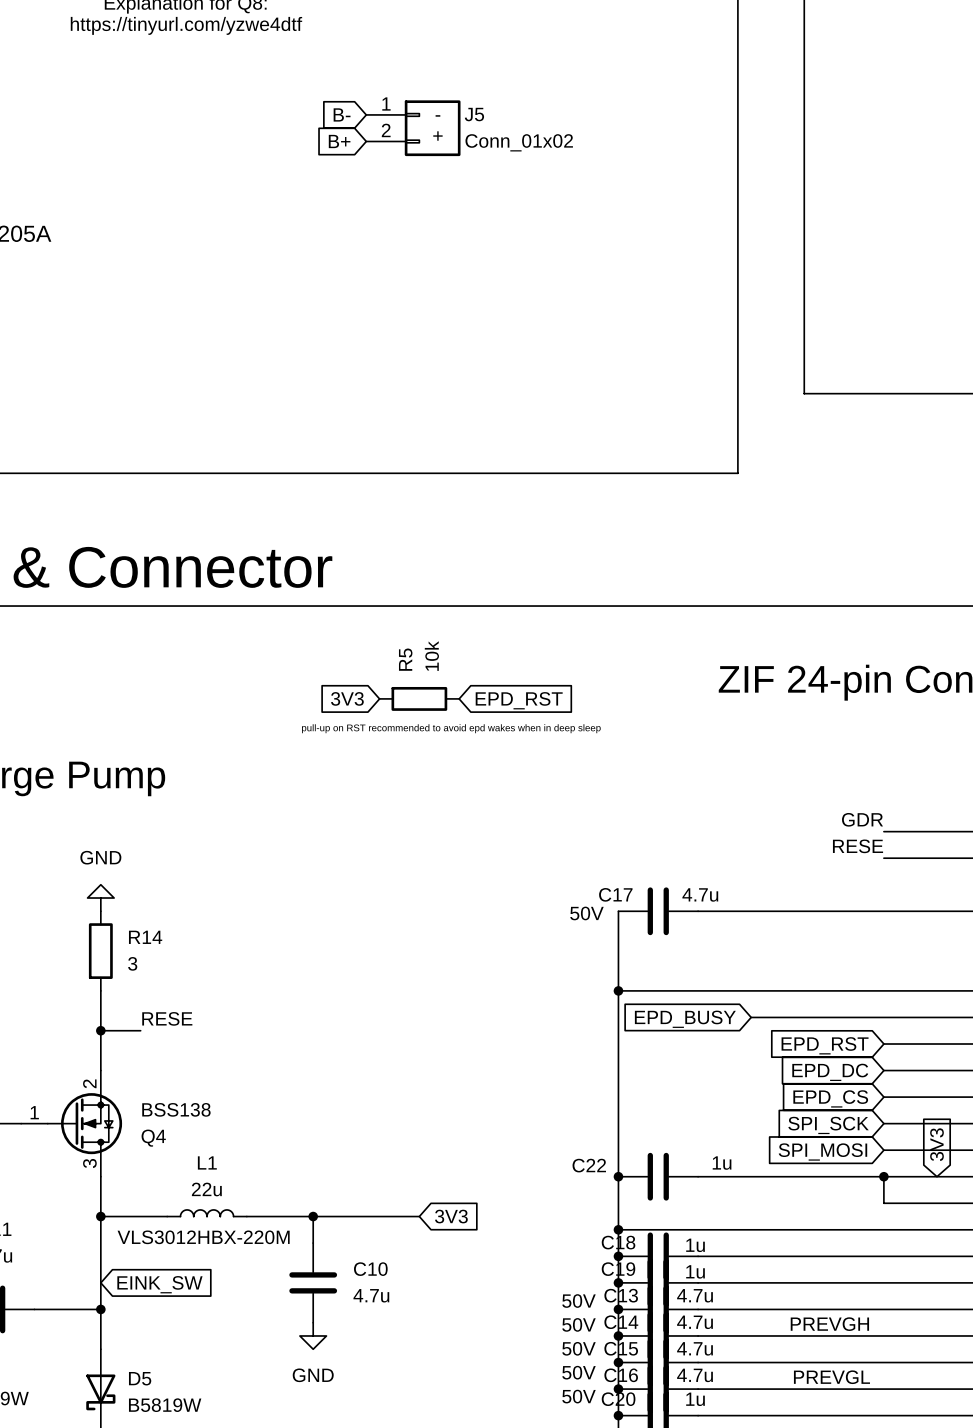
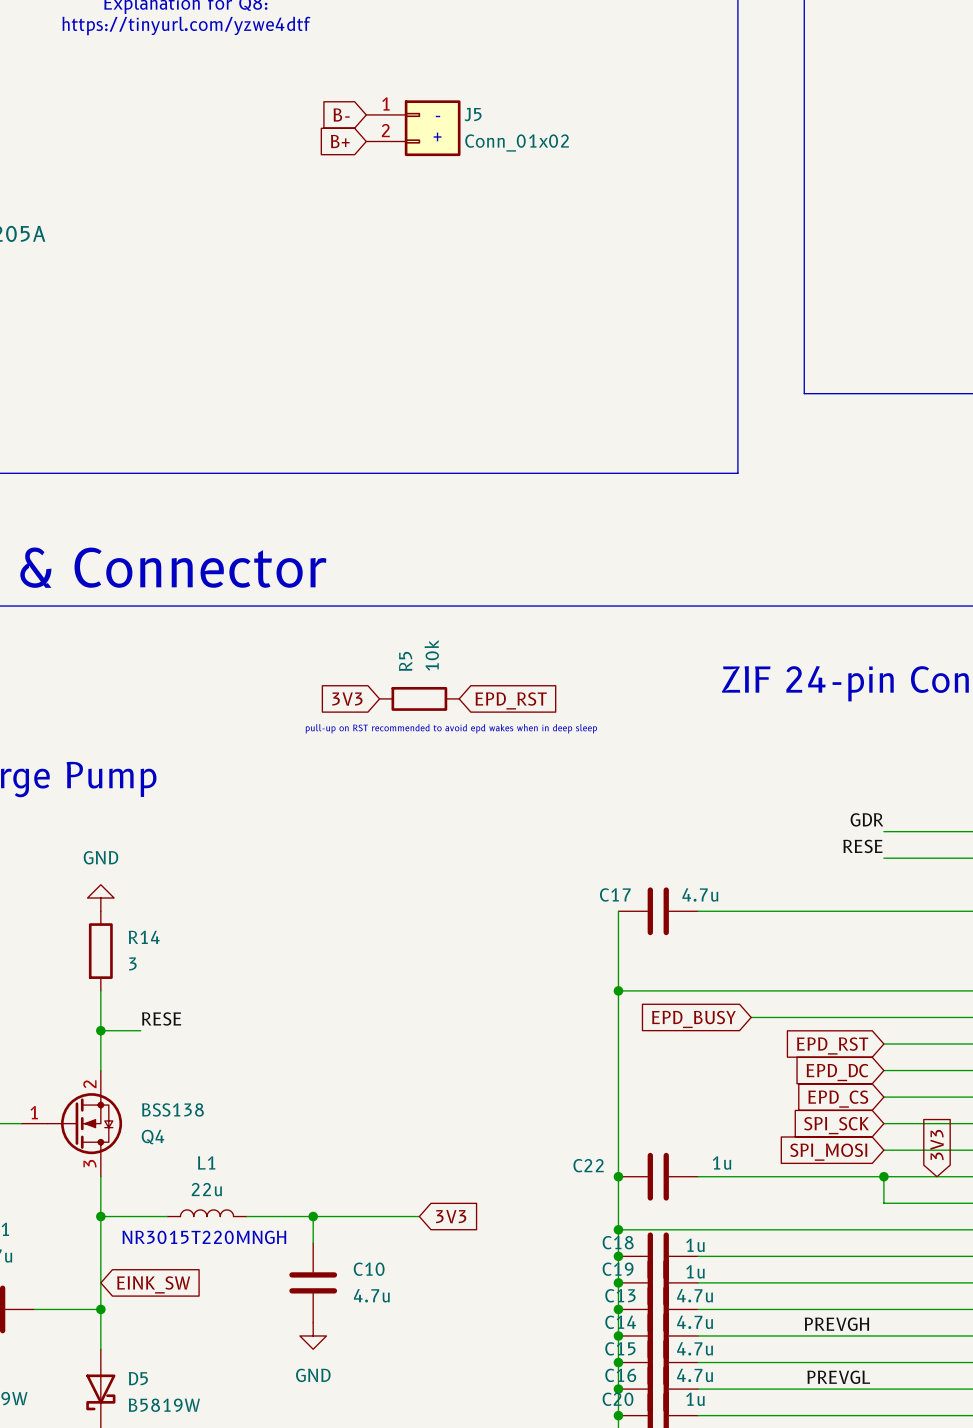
text: 50V (586, 913) -> none
text: VLS3012HBX-220M (203, 1237) -> NR3015T220MNGH (204, 1237)
text: 50V (578, 1301) -> none
text: 50V (578, 1324) -> none
text: 50V (578, 1348) -> none
text: 50V (578, 1372) -> none
text: 50V (578, 1396) -> none

